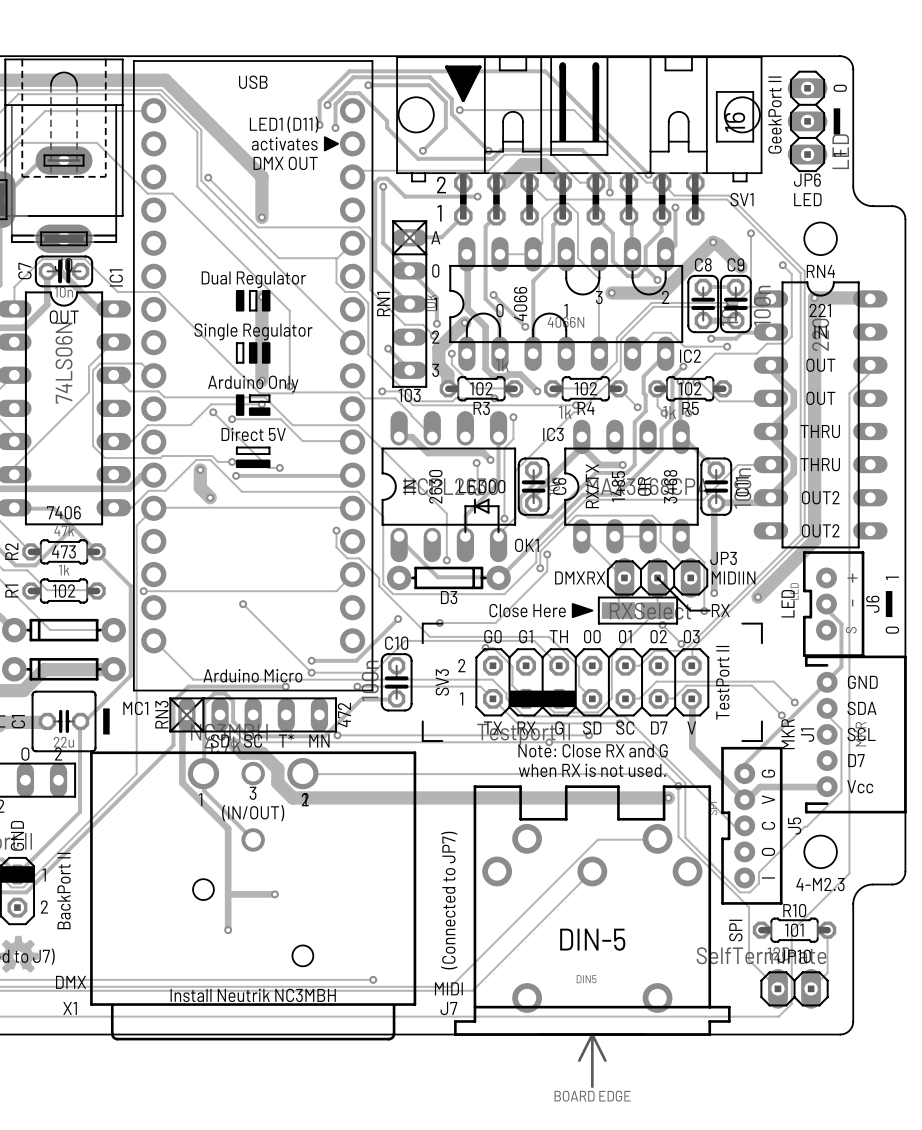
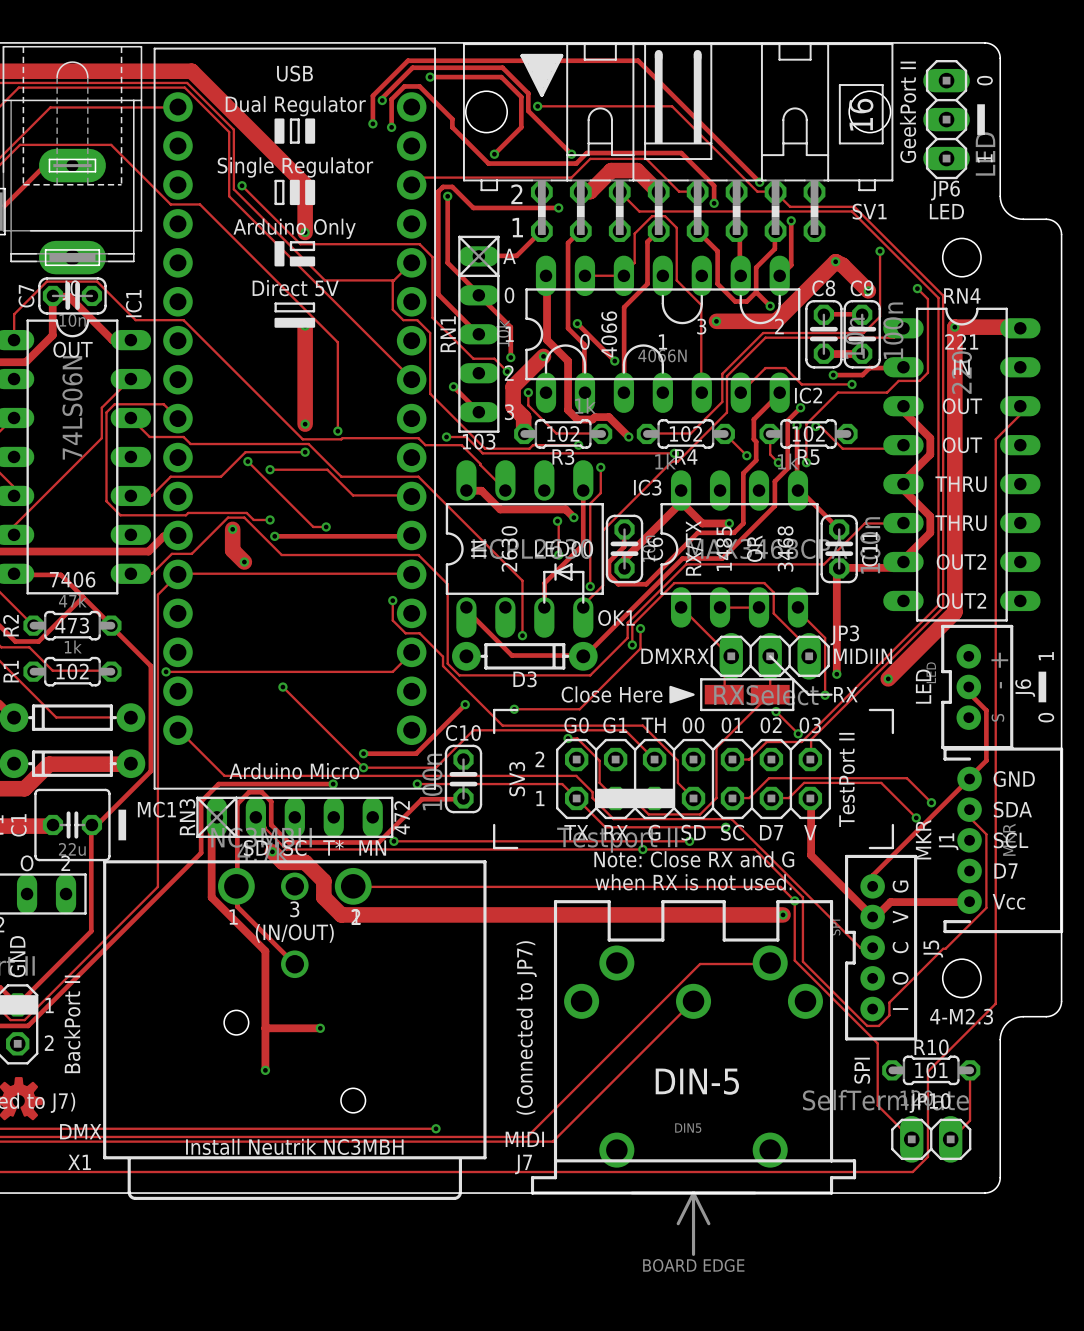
drawing: none -> [274, 118, 285, 144]
drawing: none -> [305, 118, 316, 144]
text: LED1 (D11) (284, 124) -> none
drawing: [323, 136, 339, 152] -> none
text: activates (284, 143) -> none
text: DMX OUT (285, 163) -> none
drawing: none -> [289, 179, 316, 206]
drawing: none -> [274, 241, 285, 267]
text position: Dual Regulator (253, 279) -> Dual Regulator (295, 106)
drawing: [235, 289, 245, 312] -> none
drawing: [261, 289, 271, 312] -> none
line: (249, 290) (256, 290) (256, 310) (249, 310) (249, 290) -> (290, 119) (298, 119) (298, 142) (290, 142) (290, 119)
text position: Single Regulator (253, 331) -> Single Regulator (295, 167)
drawing: [248, 342, 271, 364] -> none
line: (236, 343) (236, 362) (243, 362) (243, 343) (236, 343) -> (275, 180) (275, 203) (283, 203) (283, 180) (275, 180)
text position: Arduino Only (253, 384) -> Arduino Only (294, 228)
drawing: [235, 394, 245, 416] -> none
line: (249, 395) (249, 401) (269, 401) (269, 395) (249, 395) -> (290, 242) (290, 249) (313, 249) (313, 242) (290, 242)
drawing position: (259, 411) -> (302, 261)
text position: Direct 5V (253, 434) -> Direct 5V (295, 288)
line: (236, 447) (236, 454) (269, 454) (269, 447) (236, 447) -> (275, 303) (275, 311) (313, 311) (313, 303) (275, 303)
drawing position: (253, 463) -> (294, 322)

